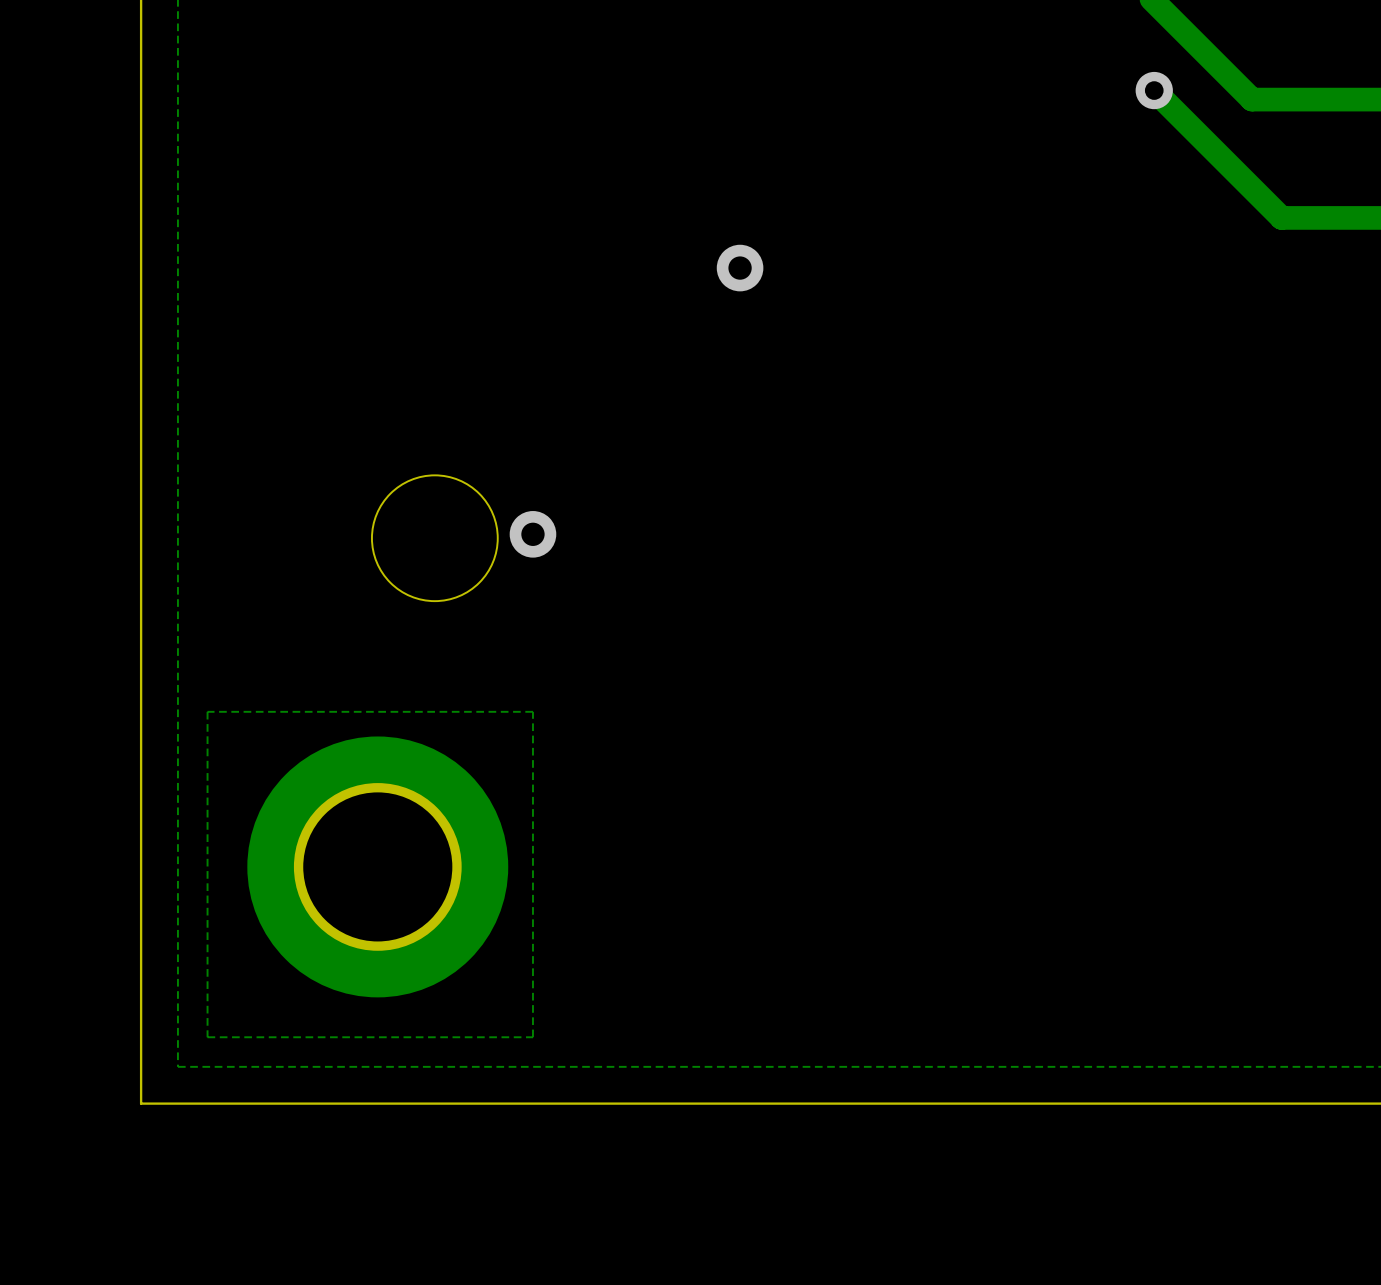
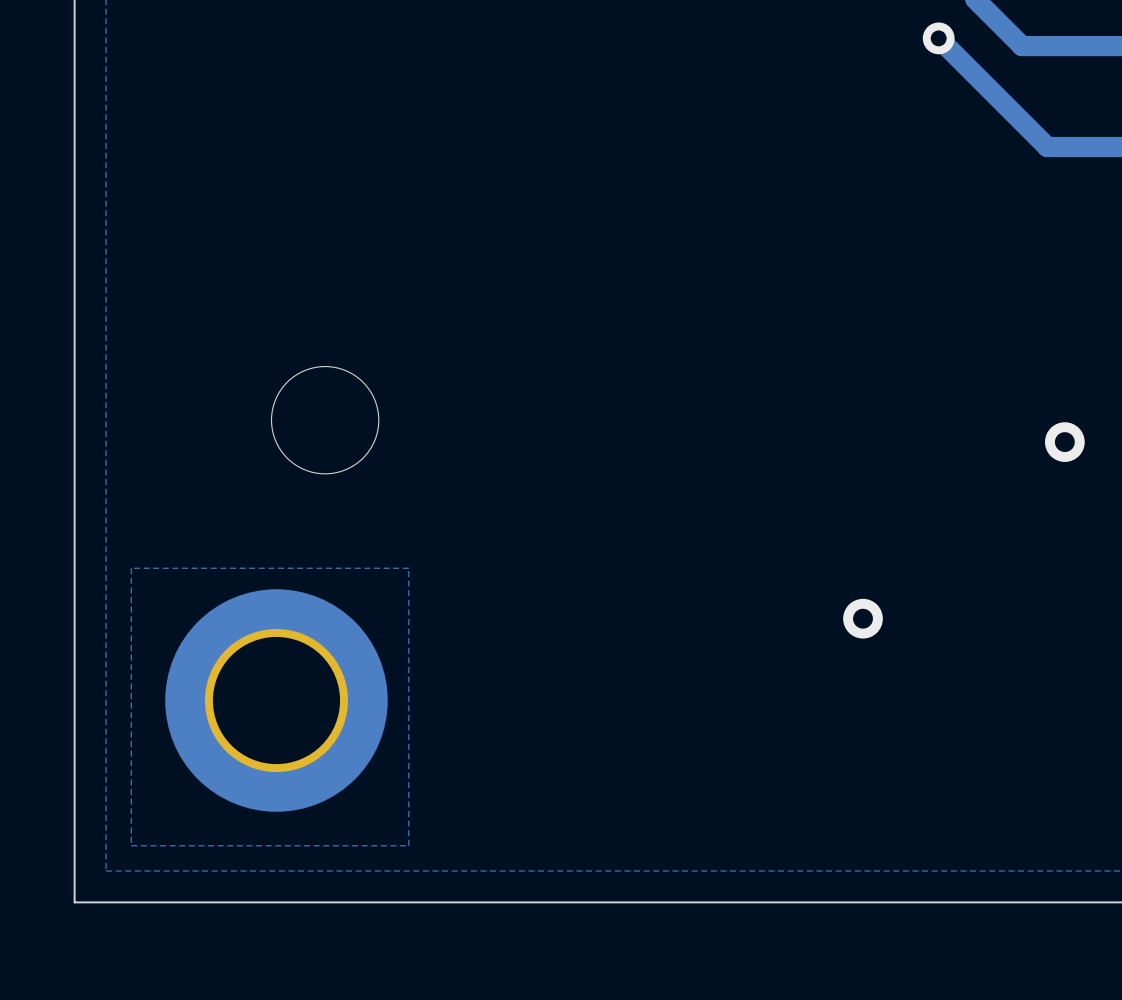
via: (740, 268) -> none
via: (532, 534) -> none
via: none -> (1064, 442)
via: none -> (863, 618)

